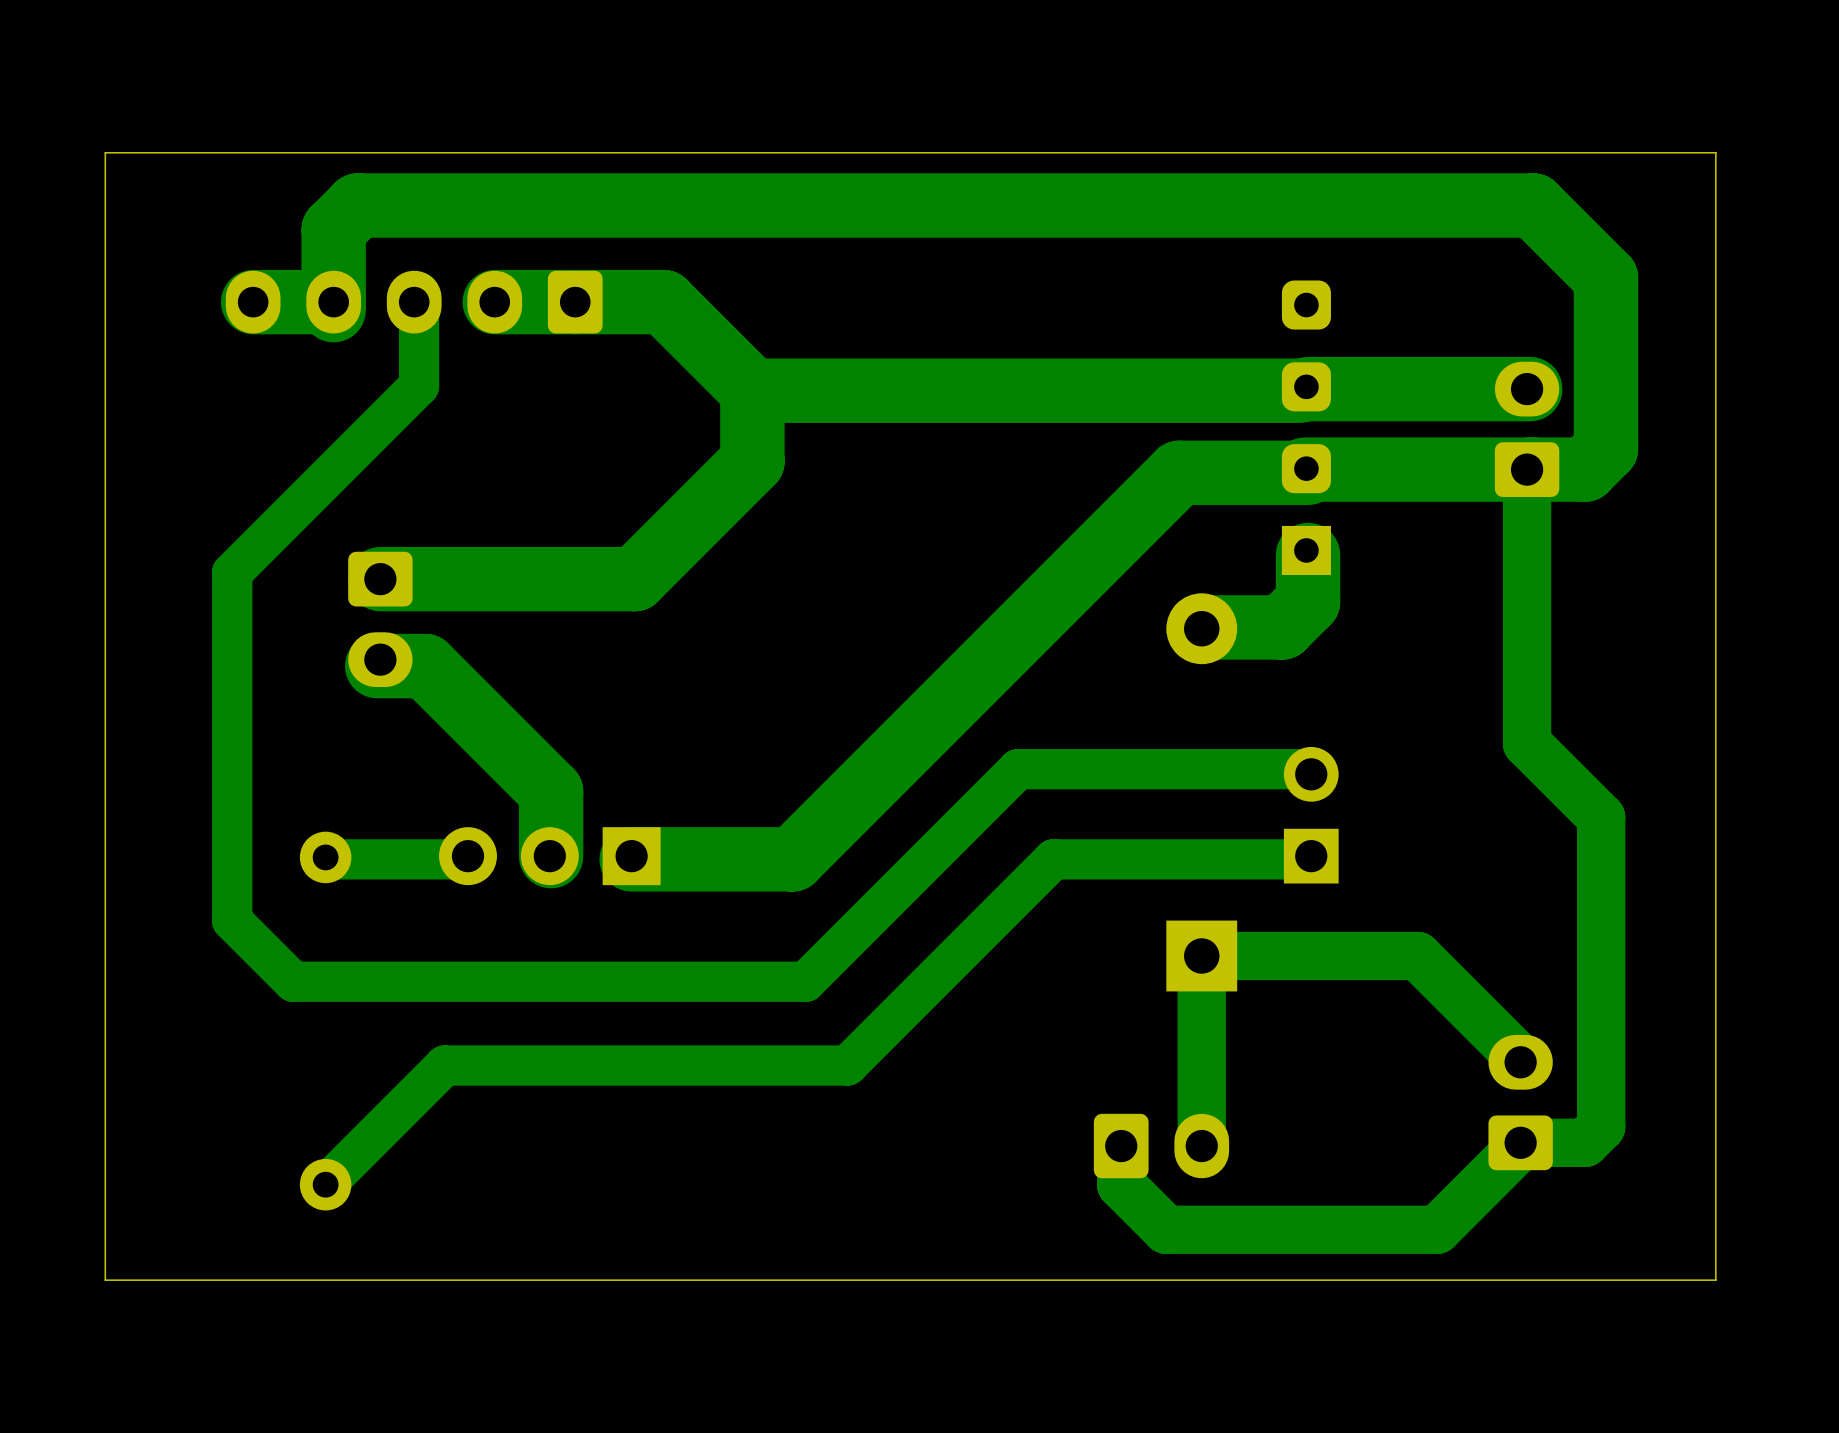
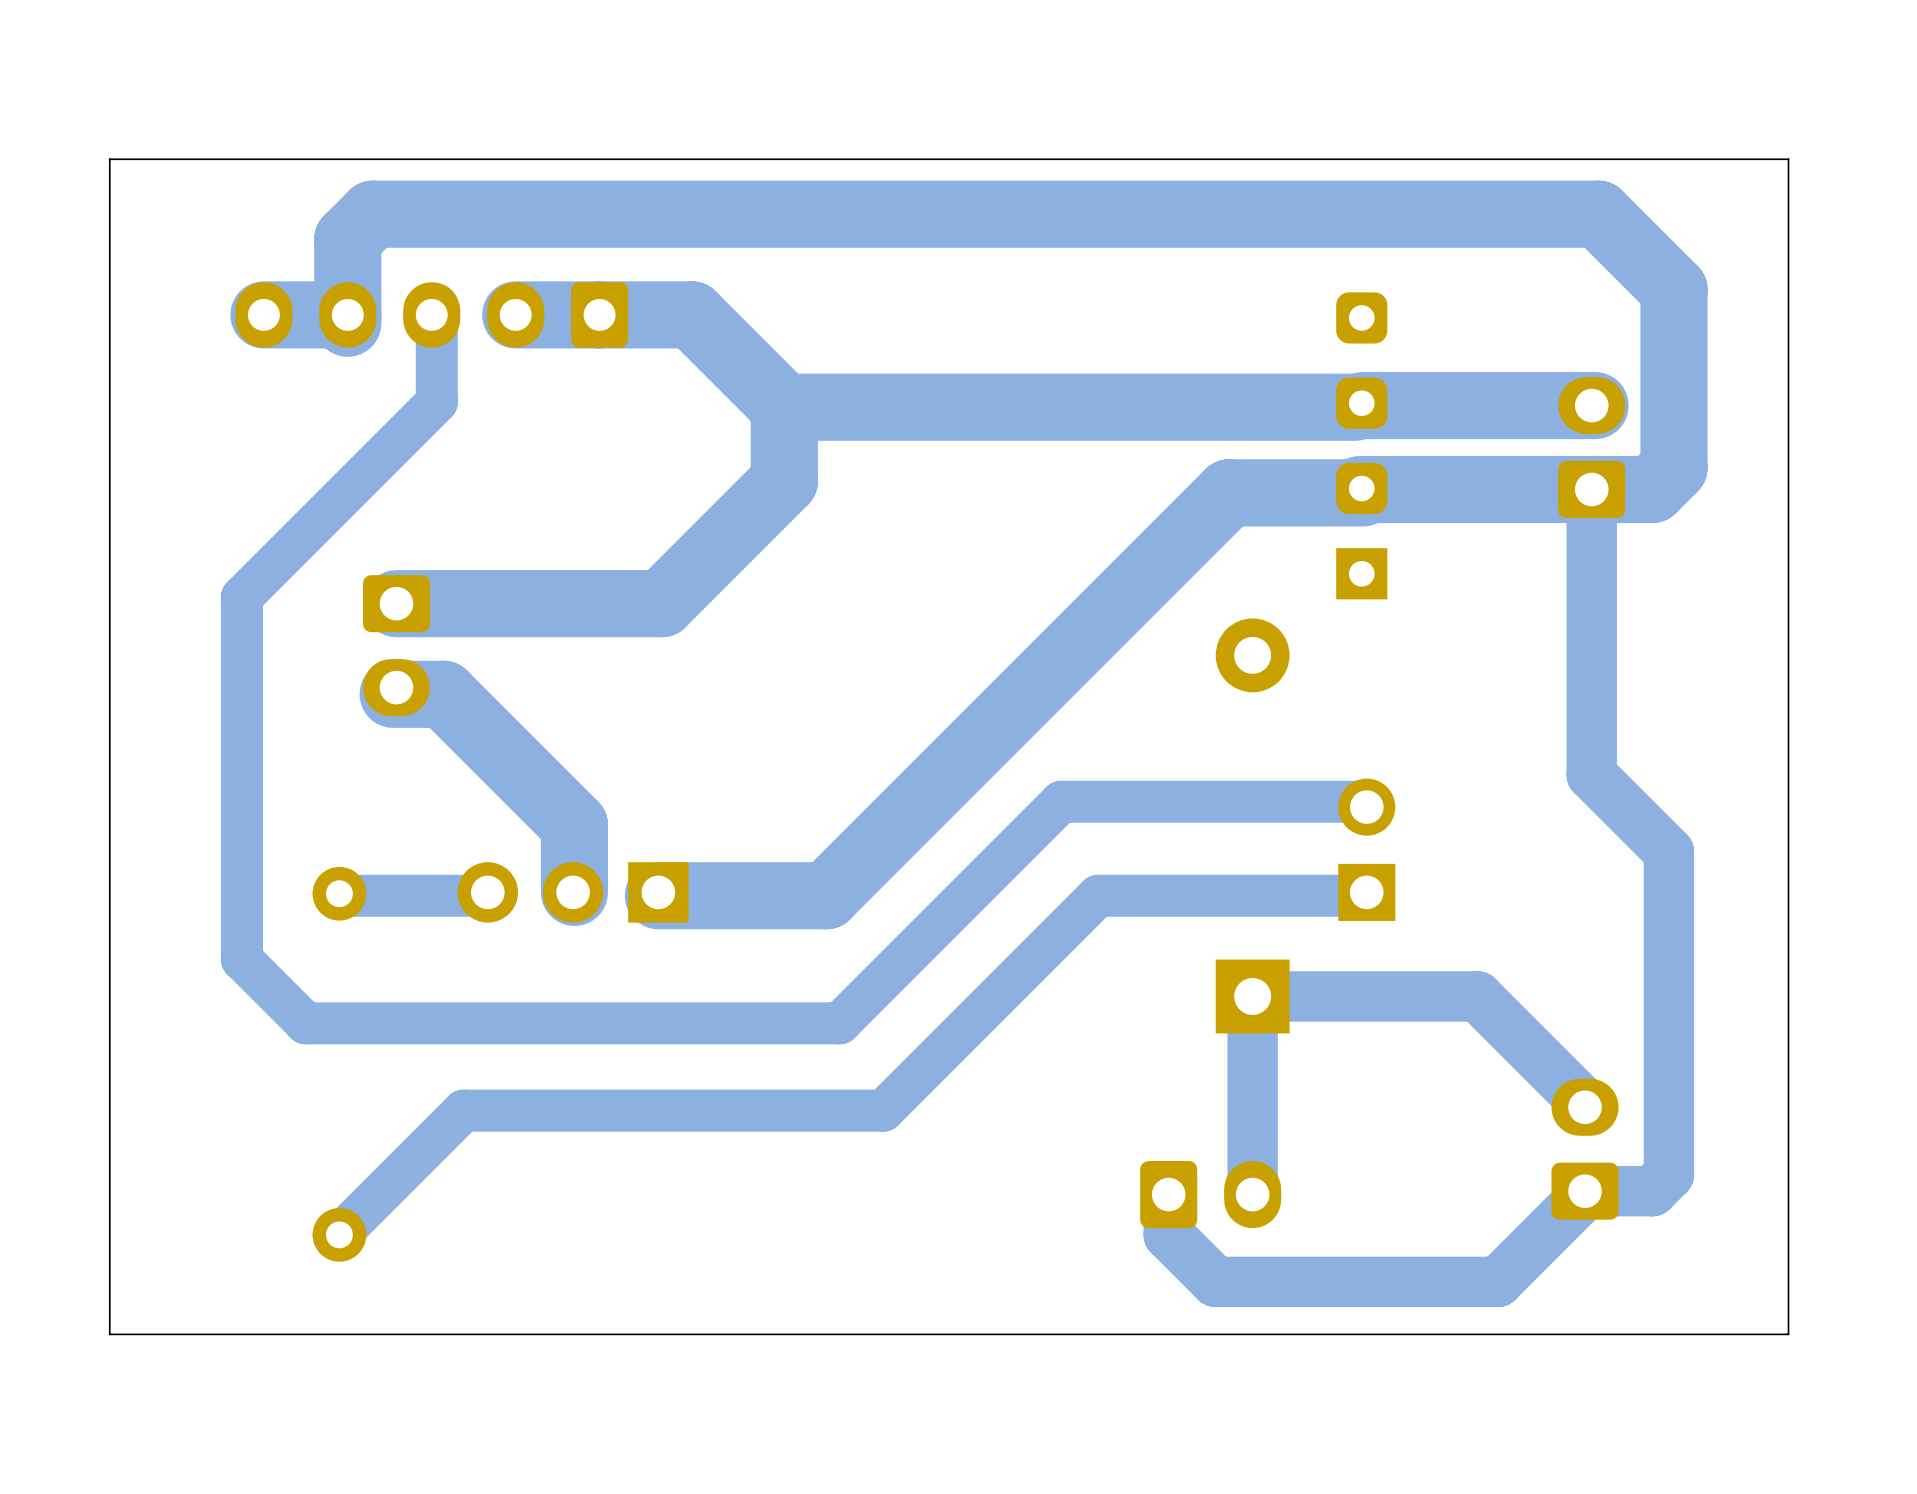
track: (1308, 554) (1308, 601) (1282, 627) (1204, 627) -> none

